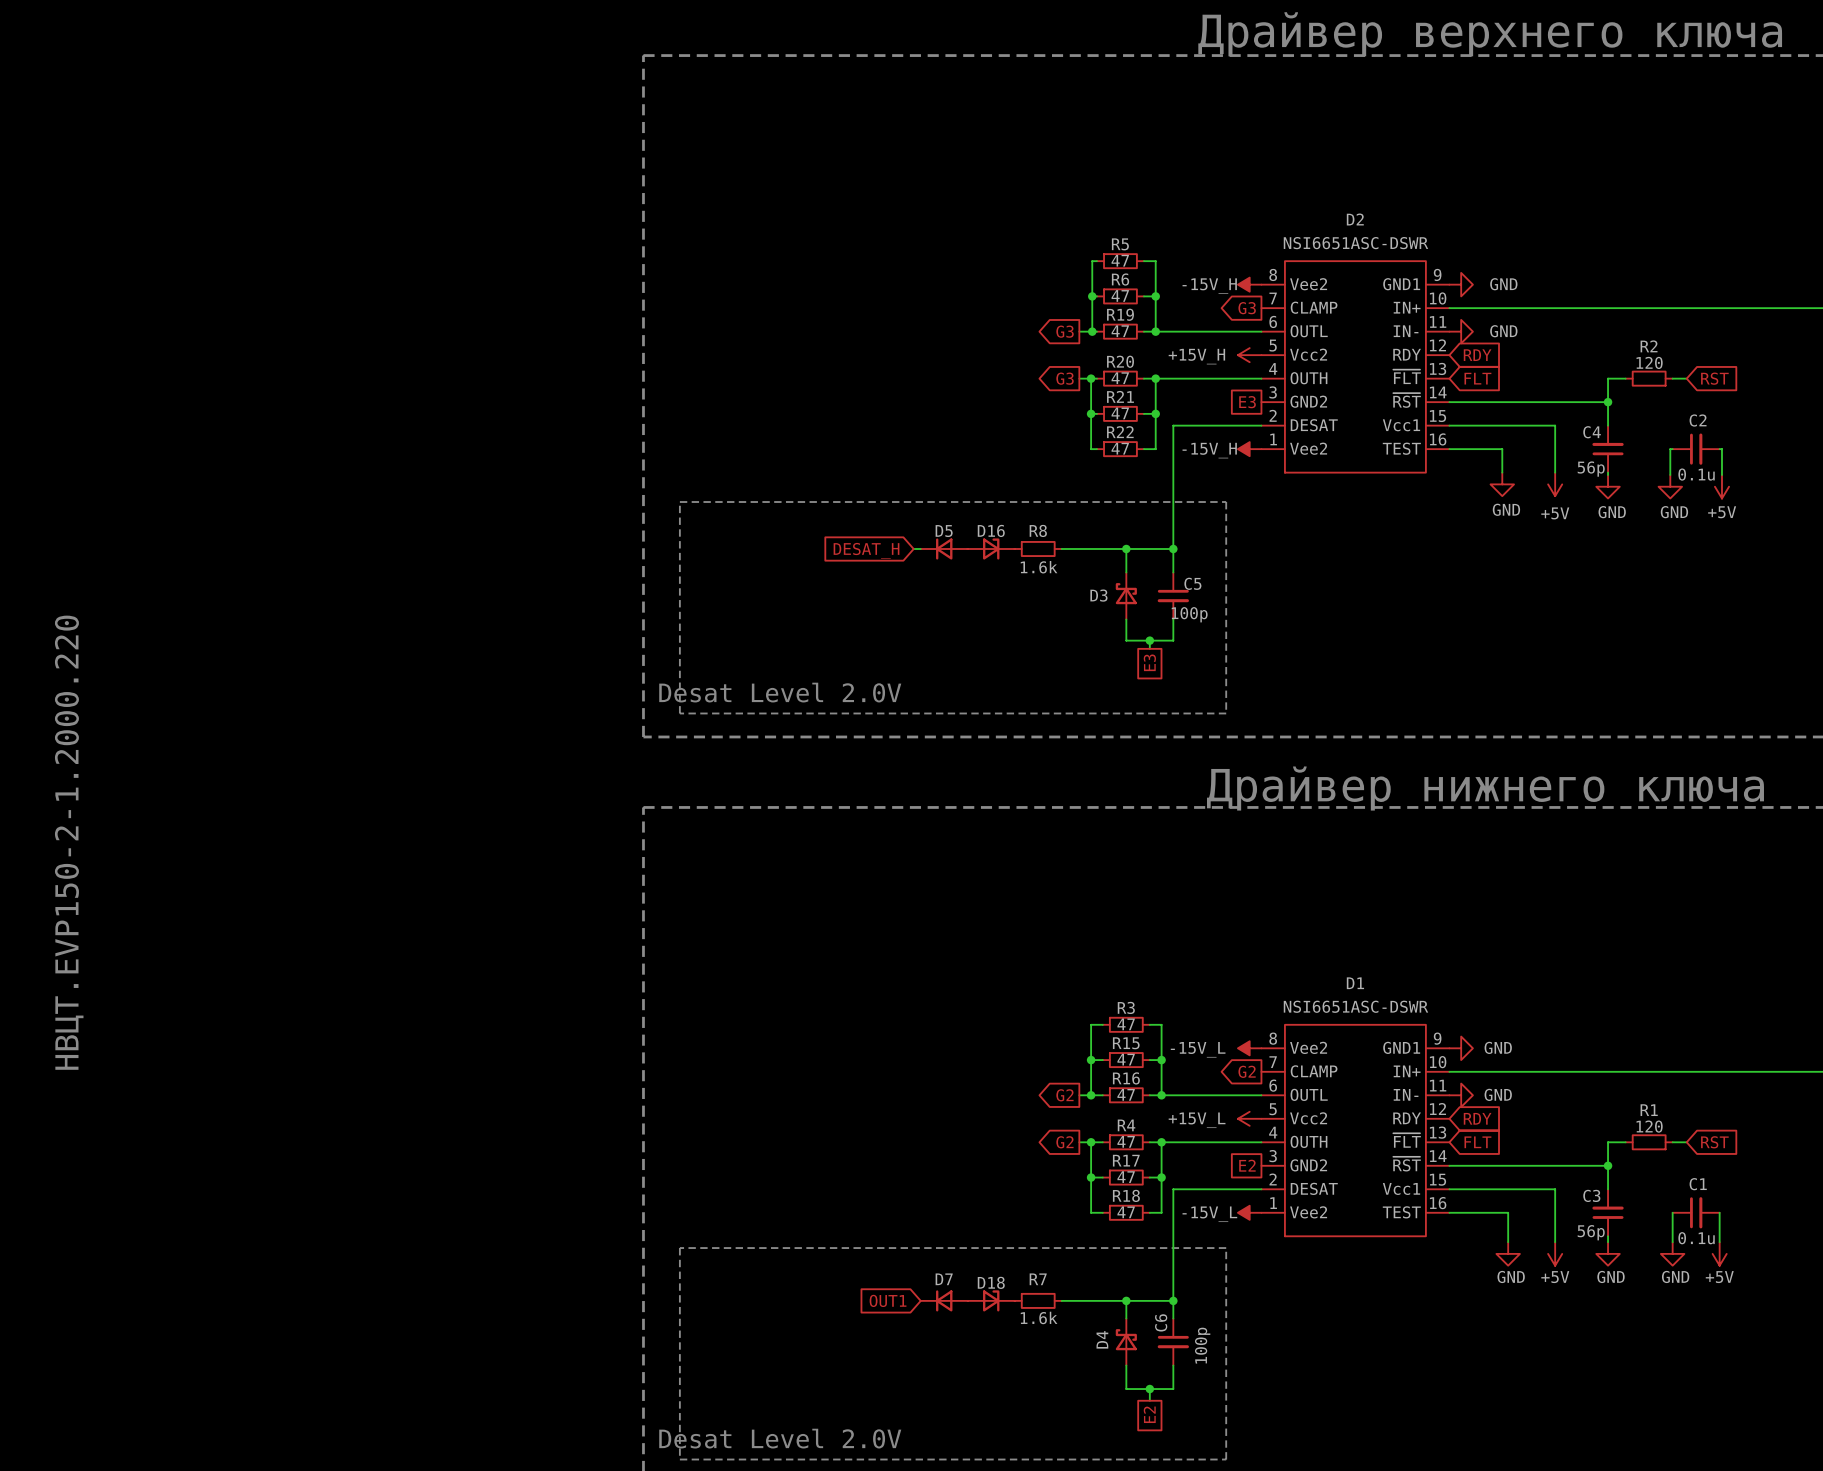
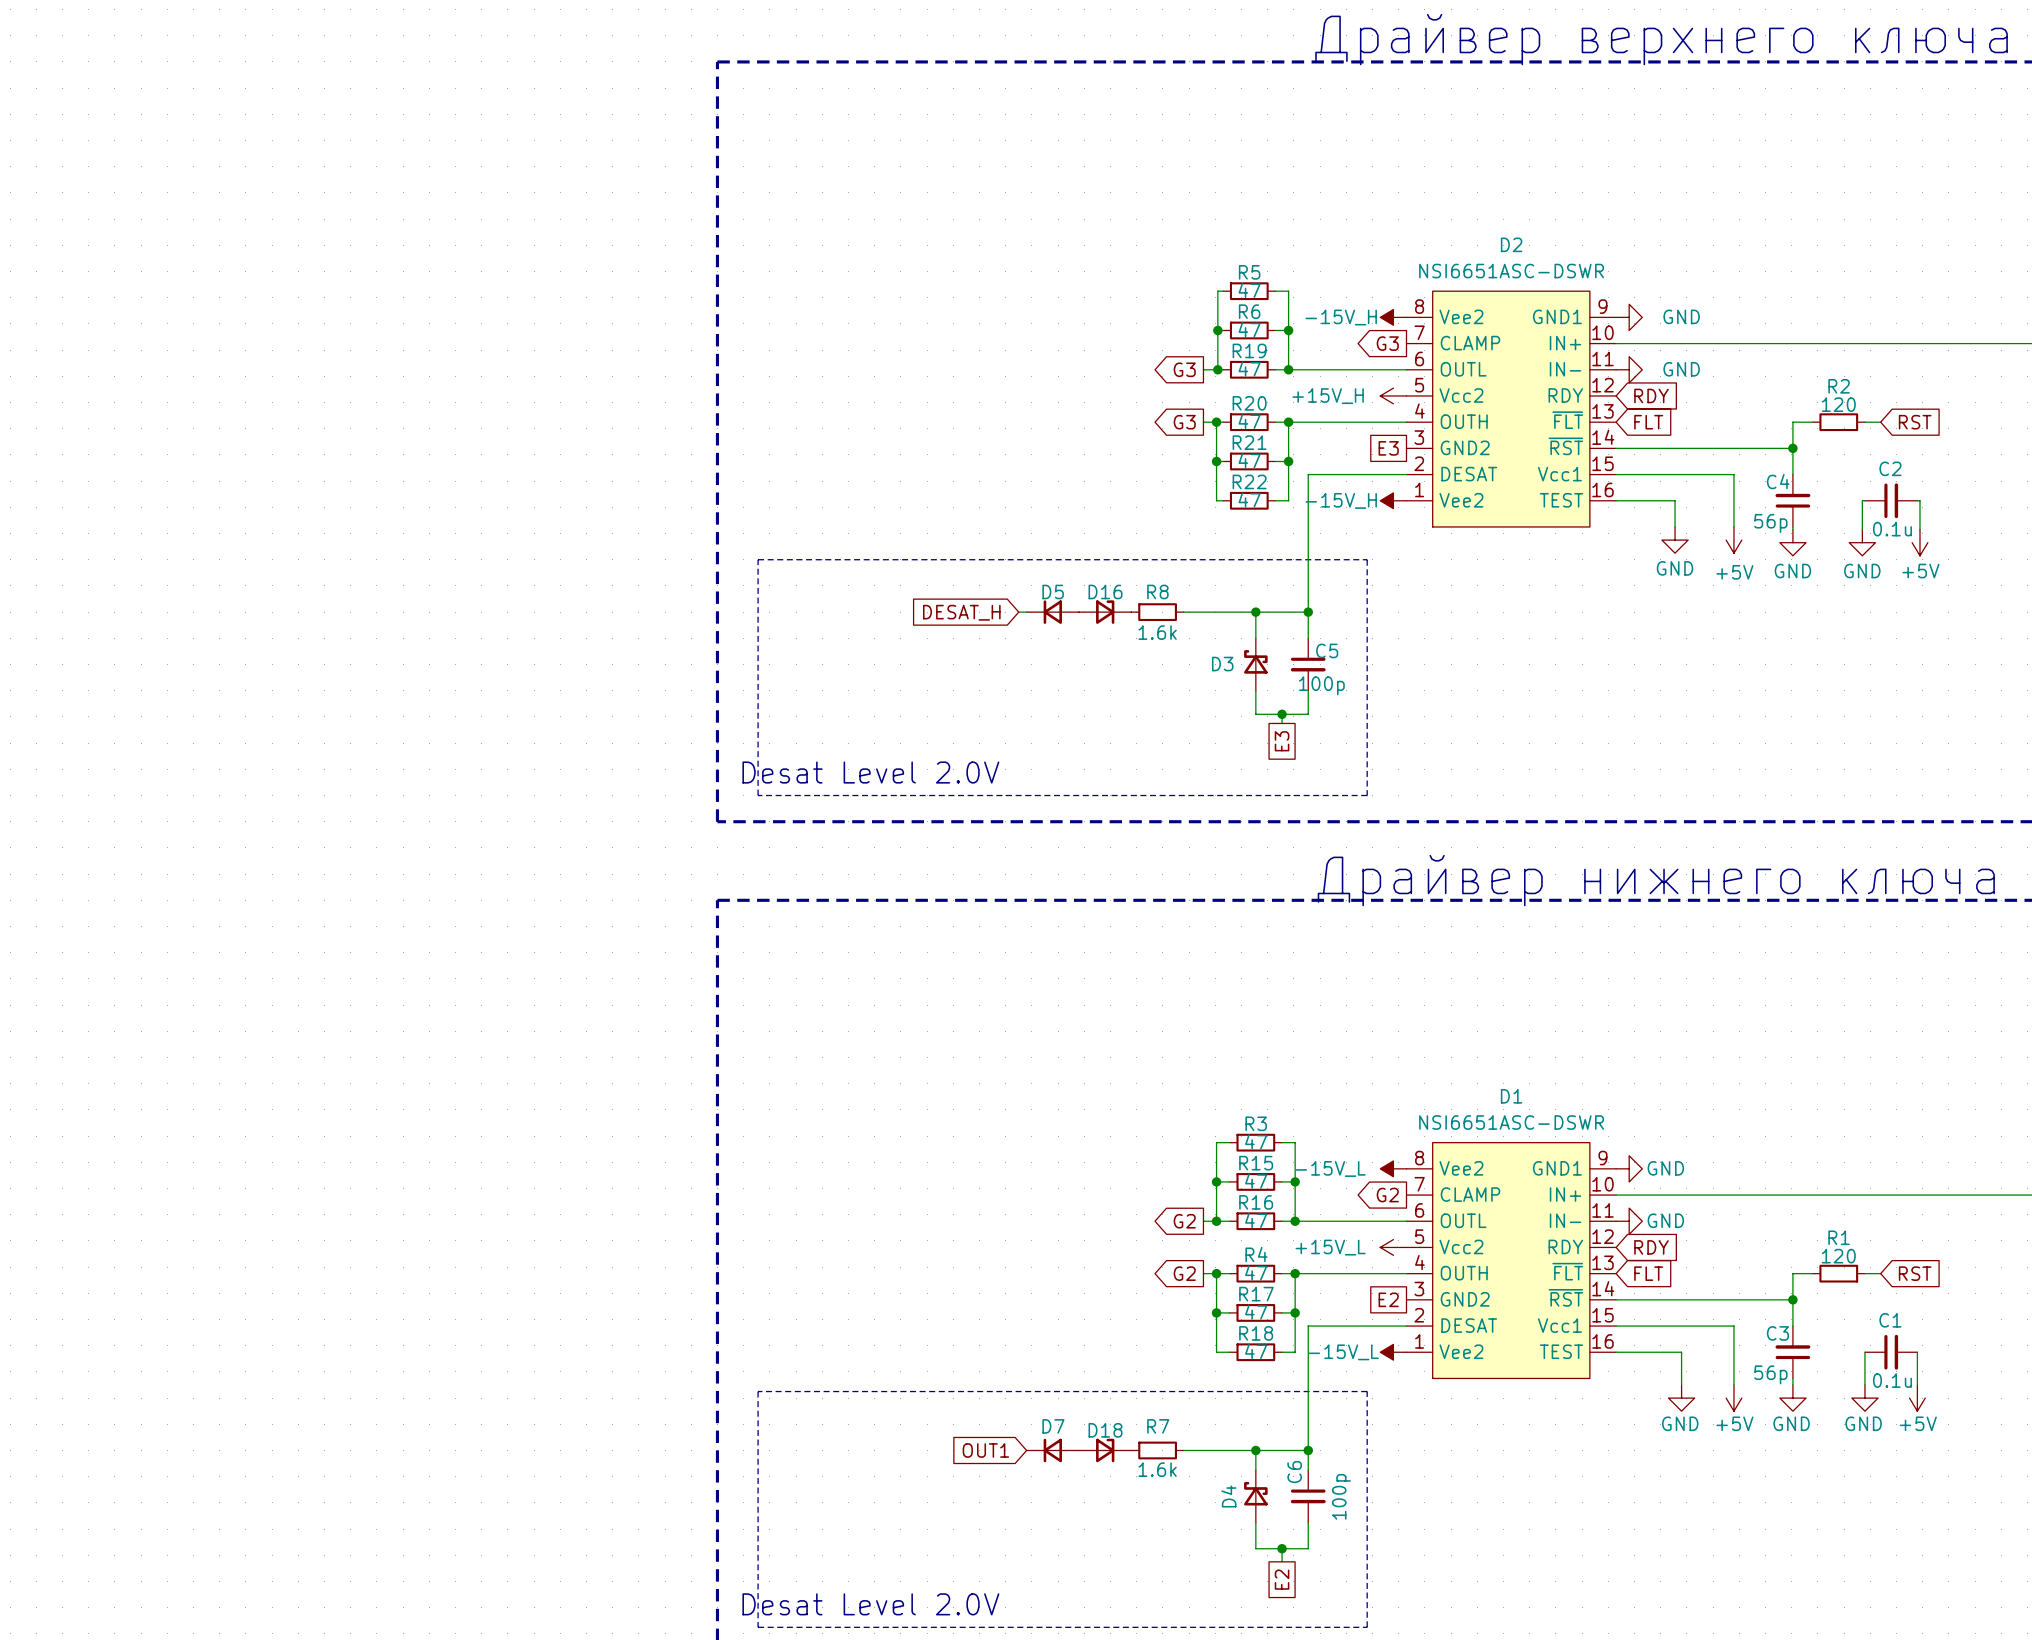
text: НВЦТ.EVP150-2-1.2000.220 (69, 842) -> none

